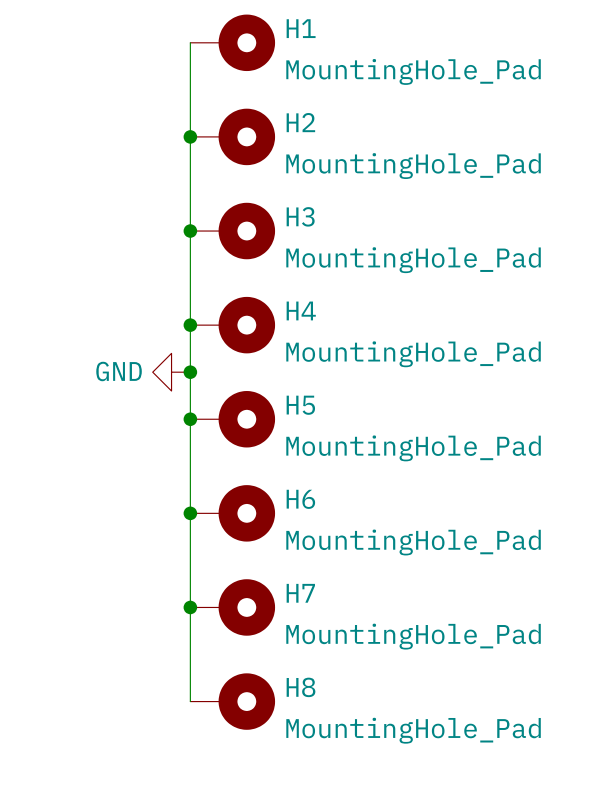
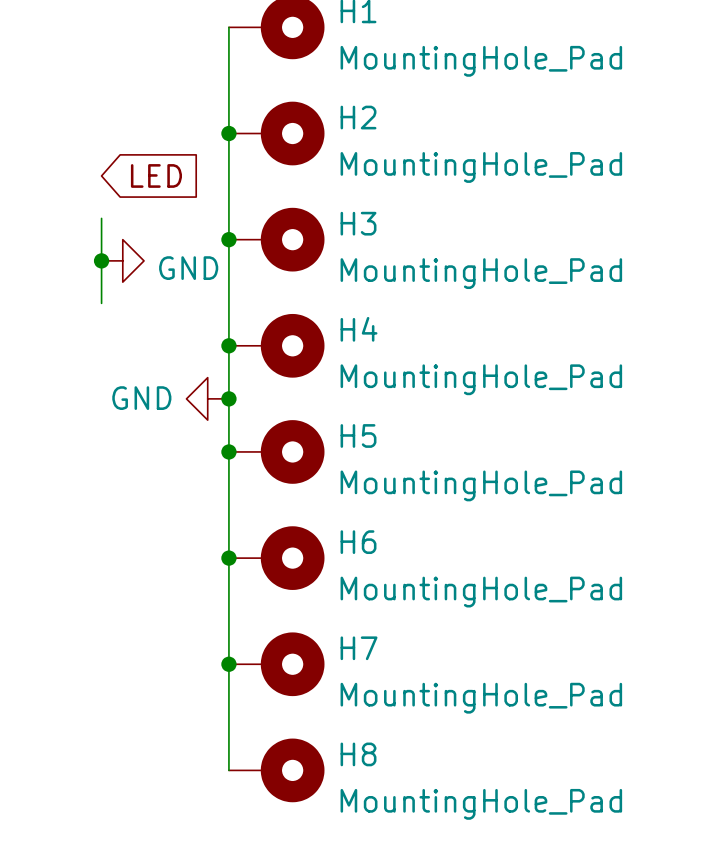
global label: none -> LED (156, 175)
wire: none -> (101, 218) (101, 303)
junction: none -> (101, 260)
power symbol: none -> GND (122, 260)

